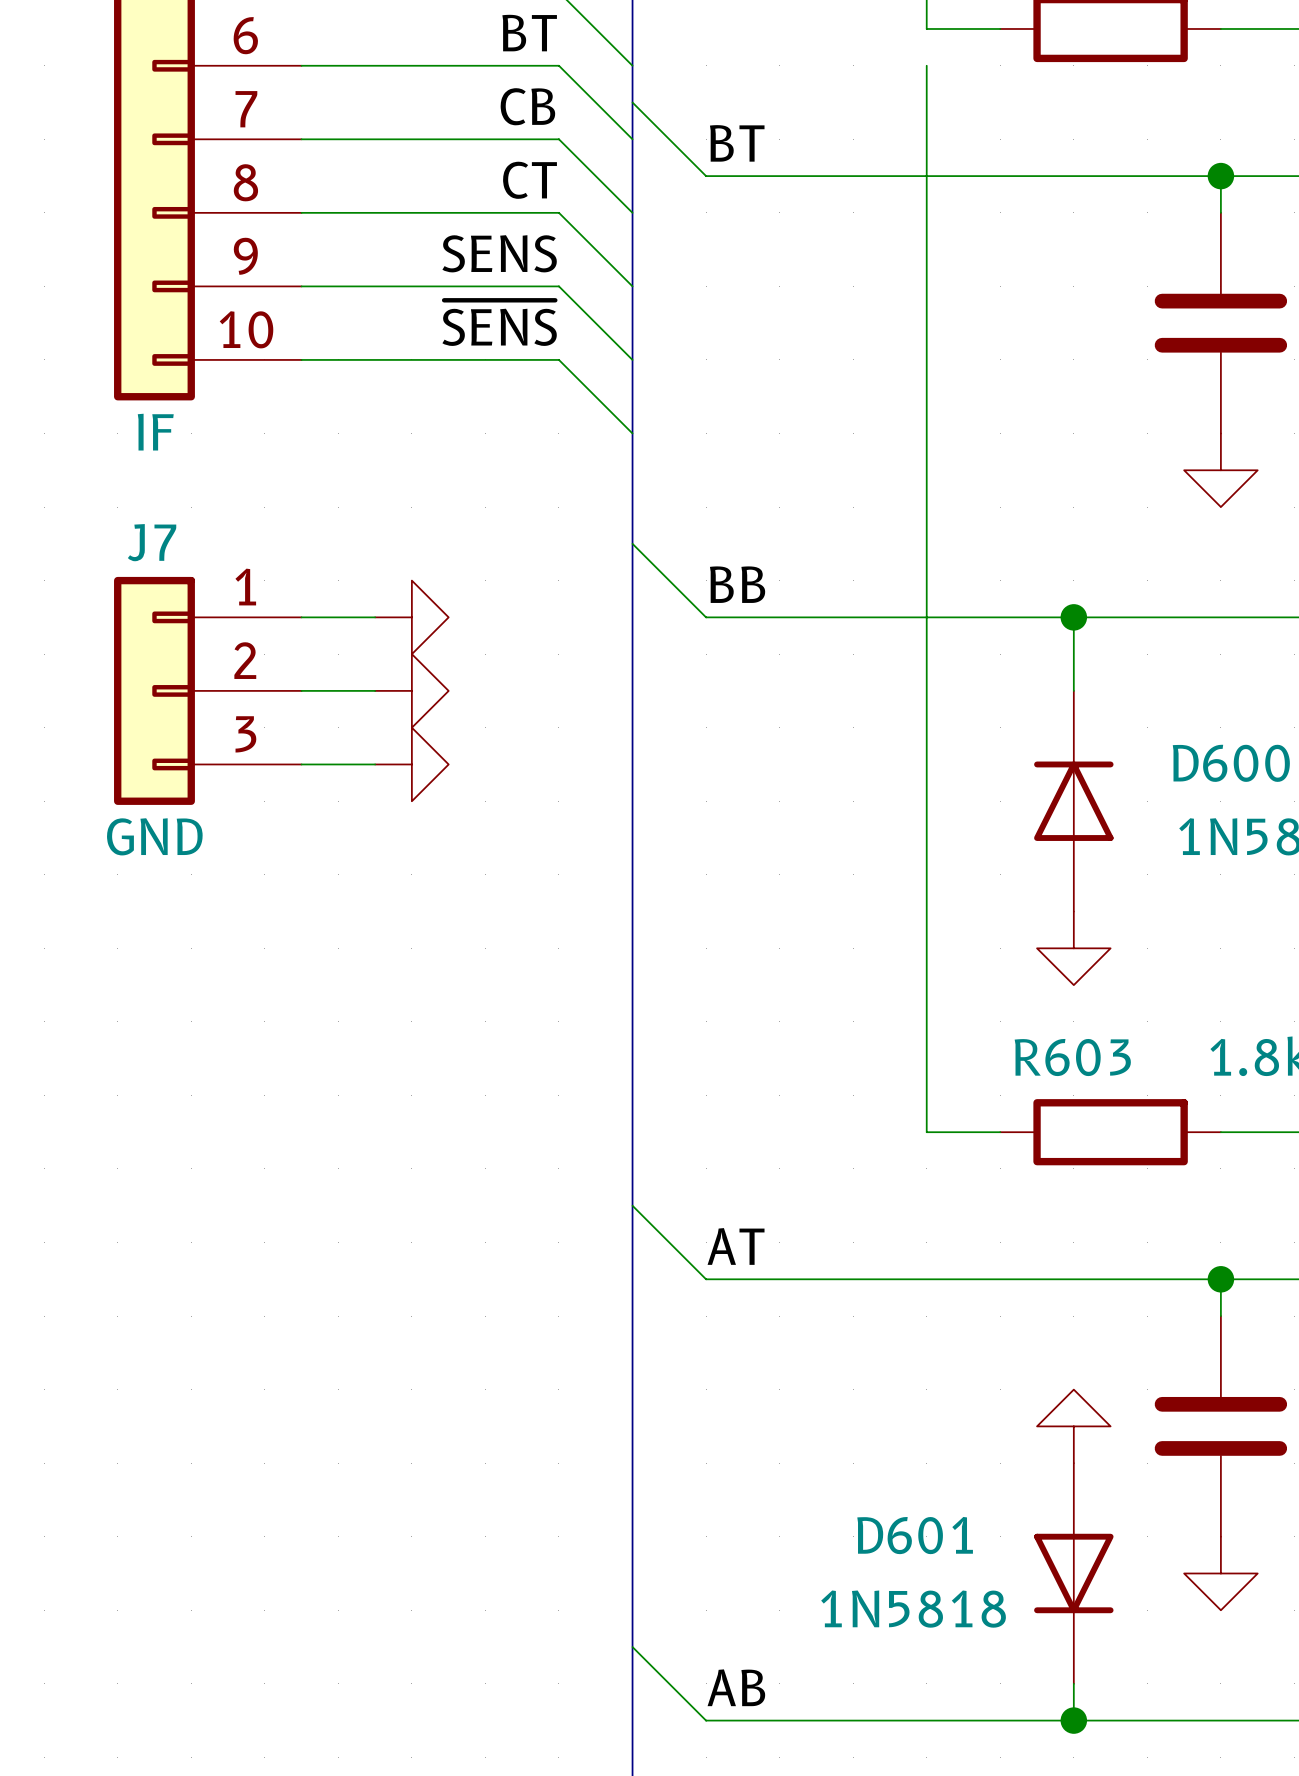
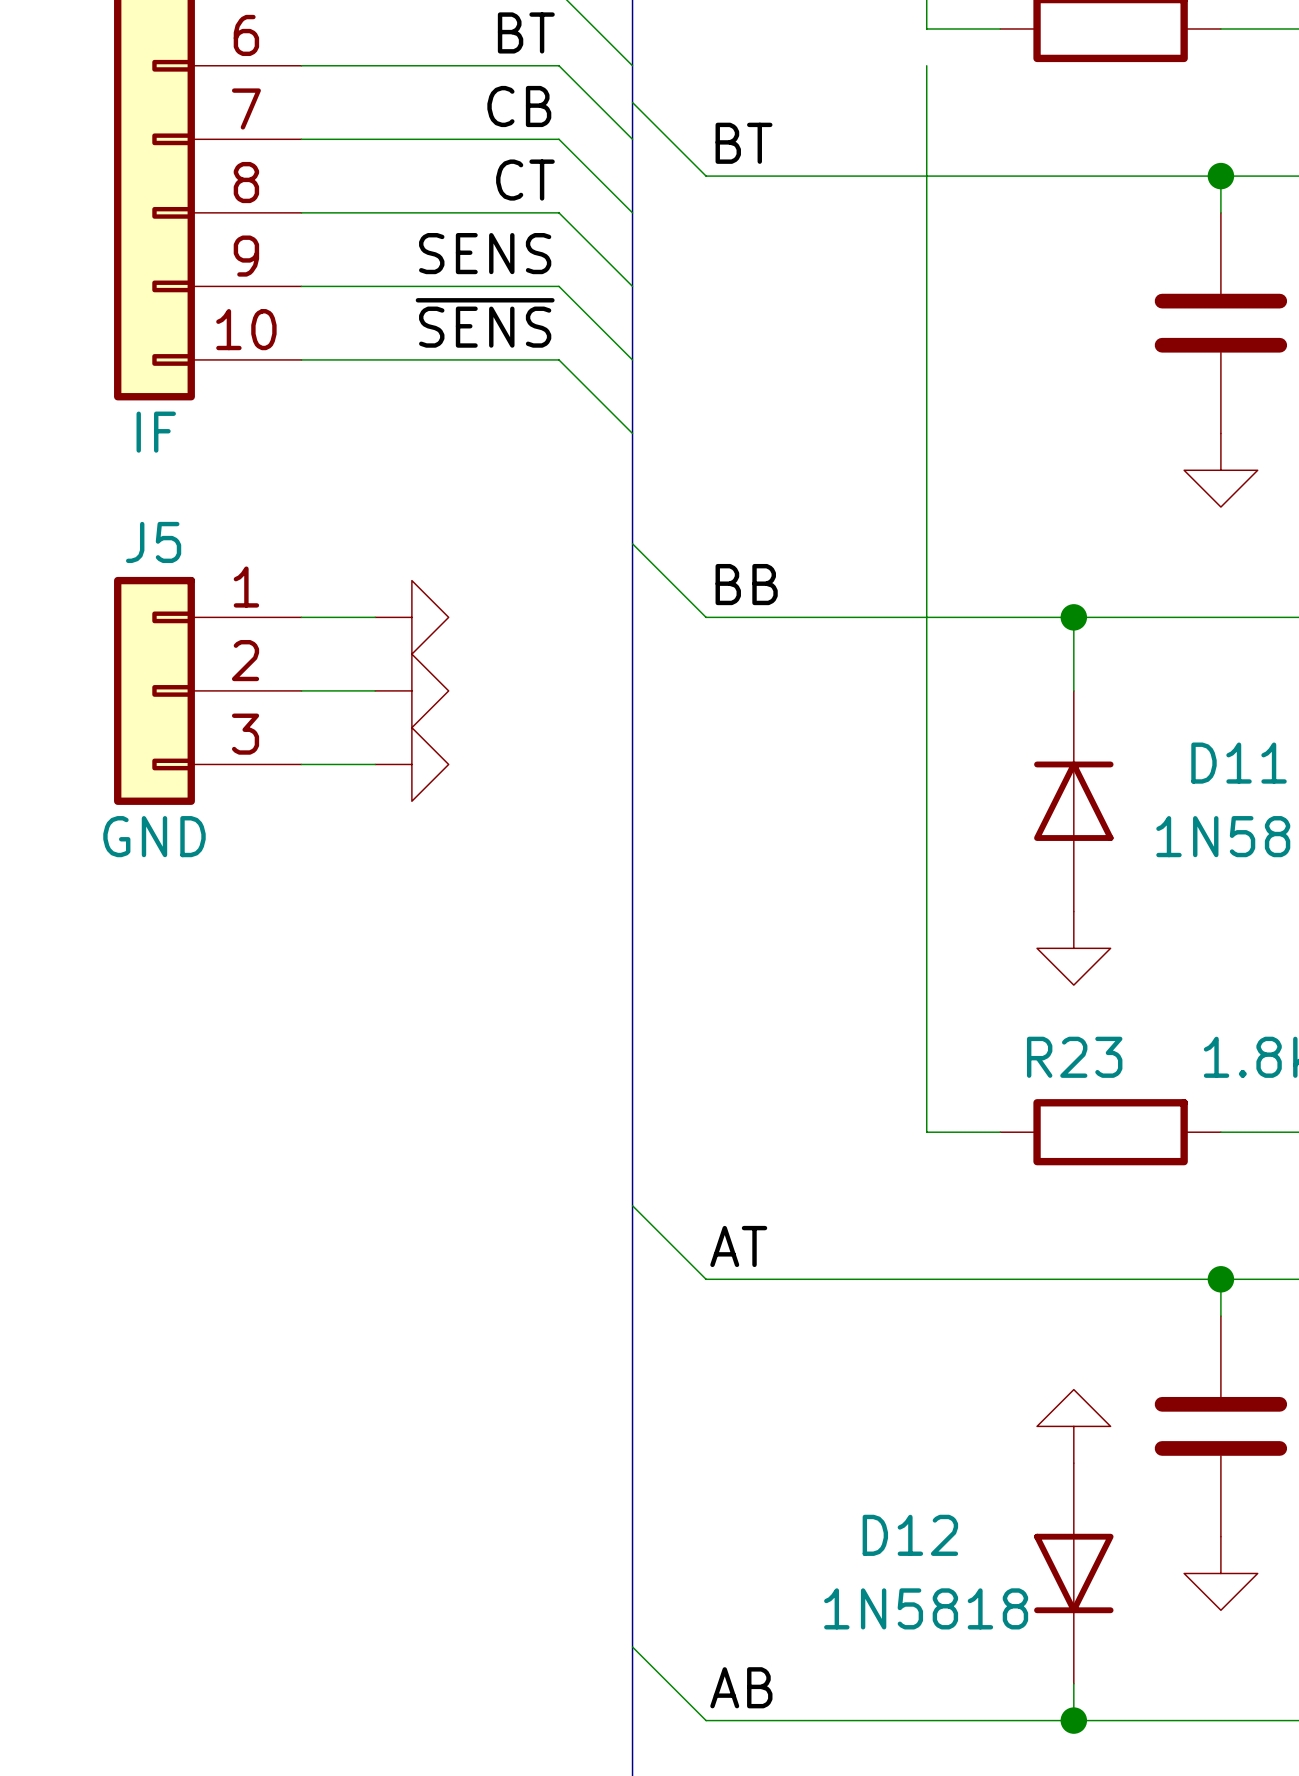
J7 name: J7 (152, 542) -> J5 (153, 542)
D600 name: D600 (1231, 763) -> D11 (1239, 763)
R603 name: R603 (1072, 1057) -> R23 (1074, 1057)
D601 name: D601 (915, 1535) -> D12 (910, 1535)

